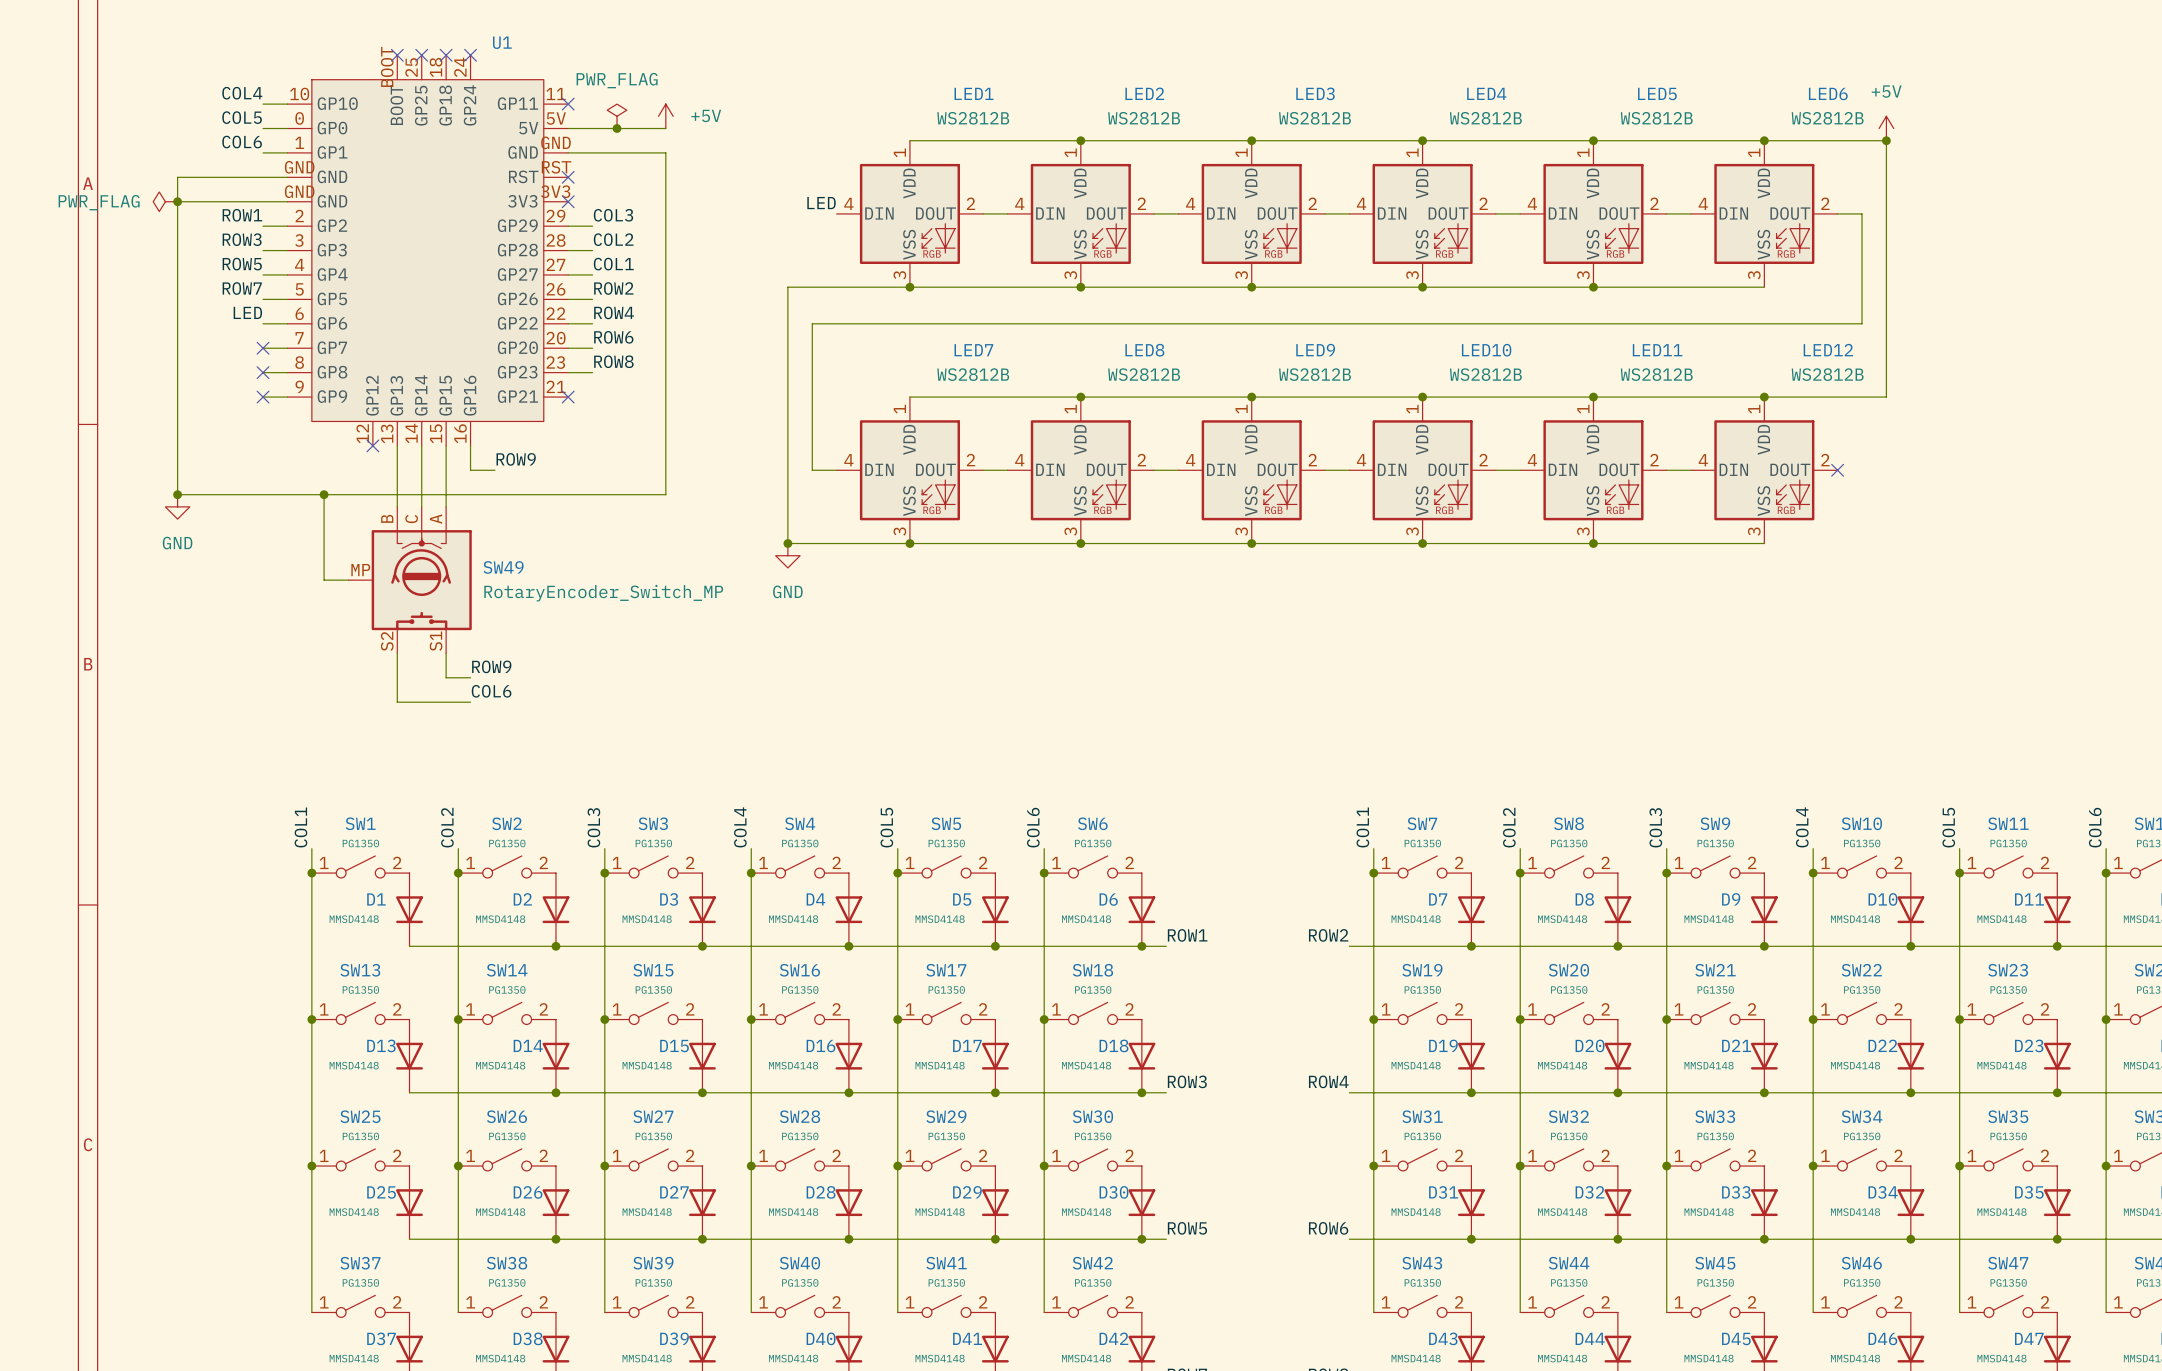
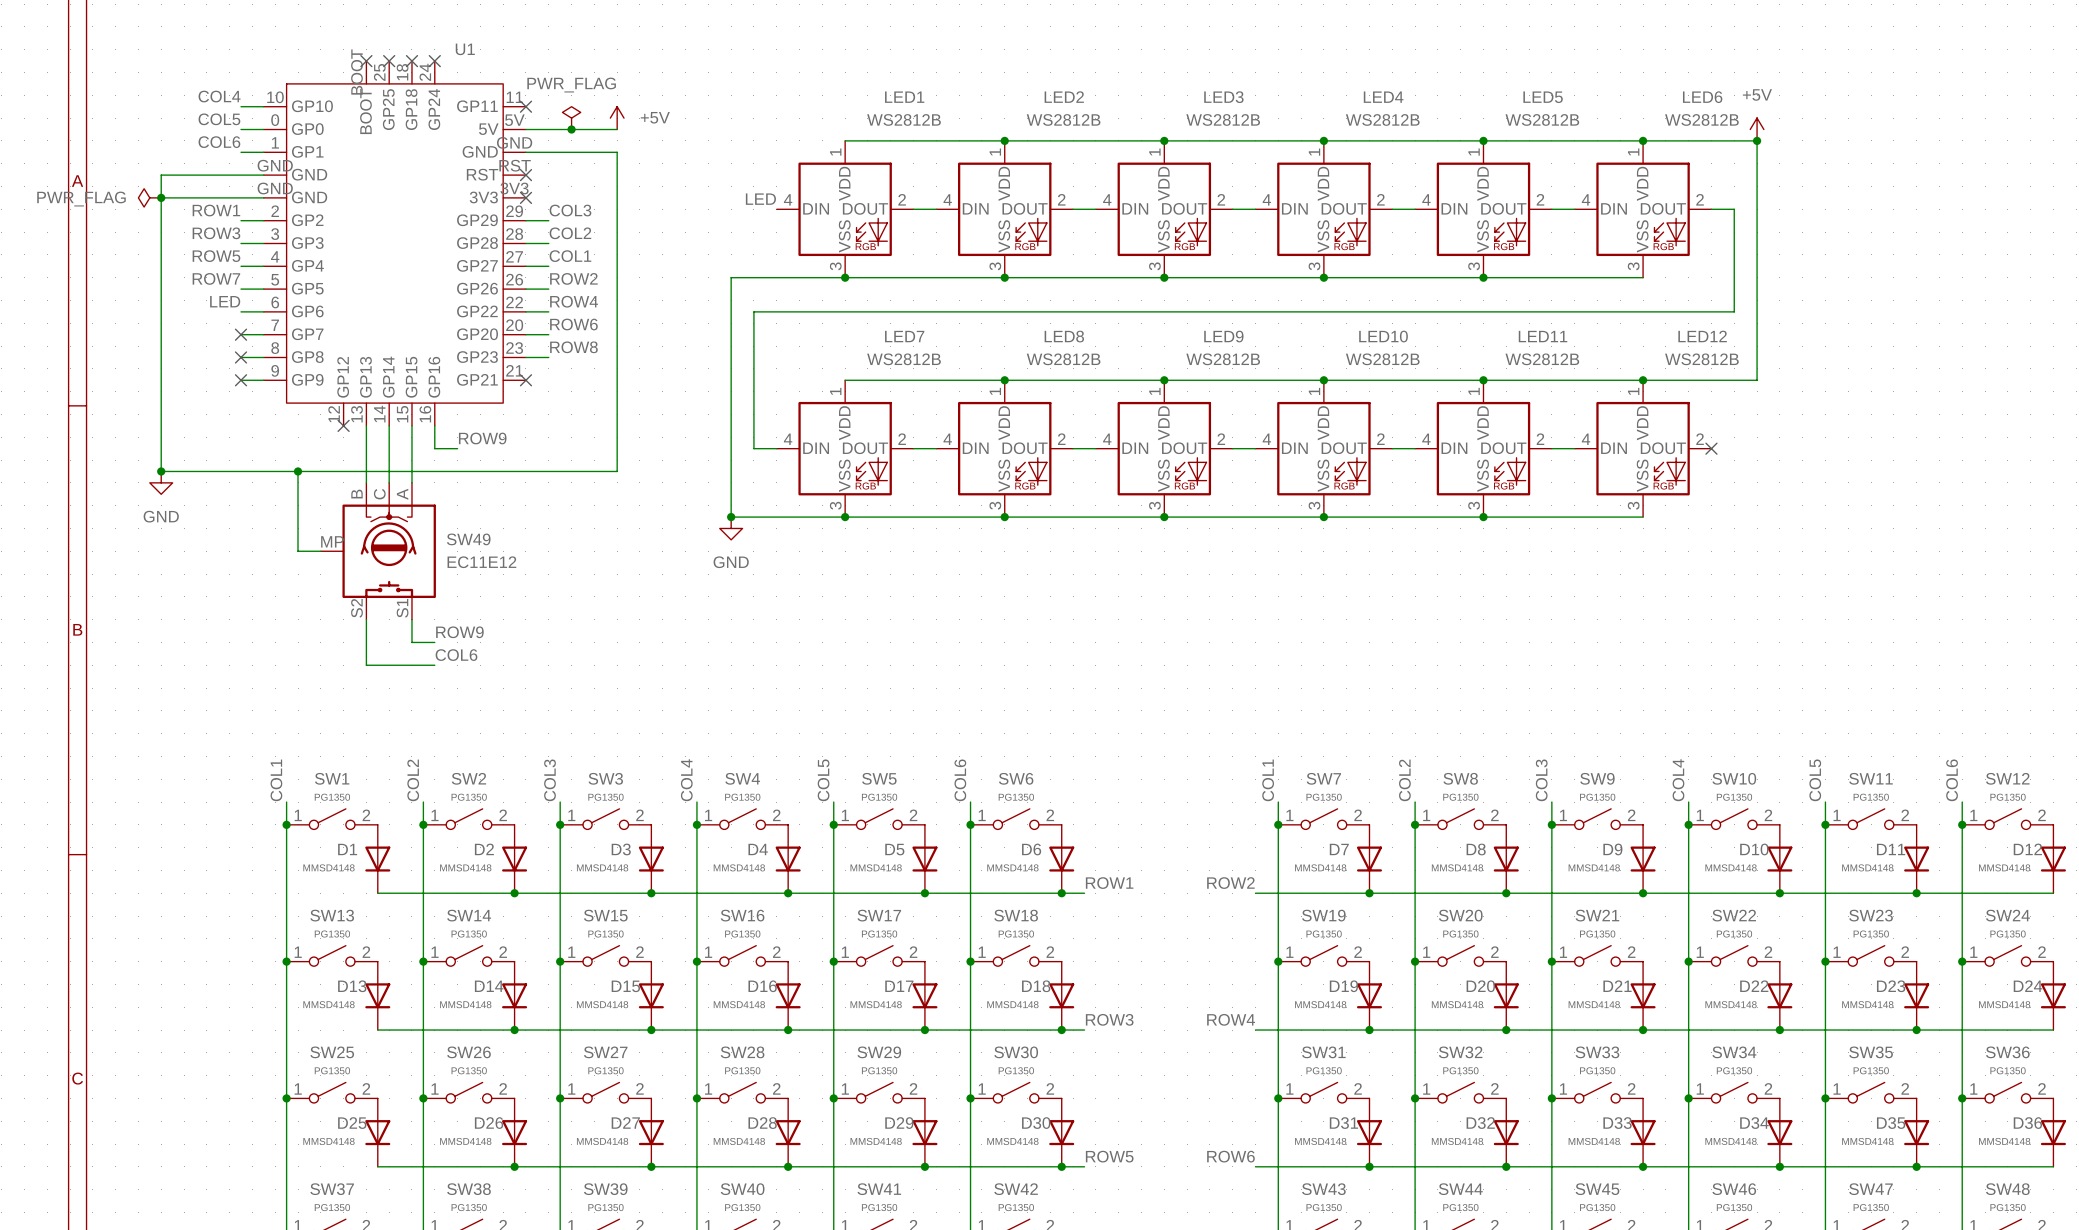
SW49 value: RotaryEncoder_Switch_MP (603, 593) -> EC11E12 (481, 562)

